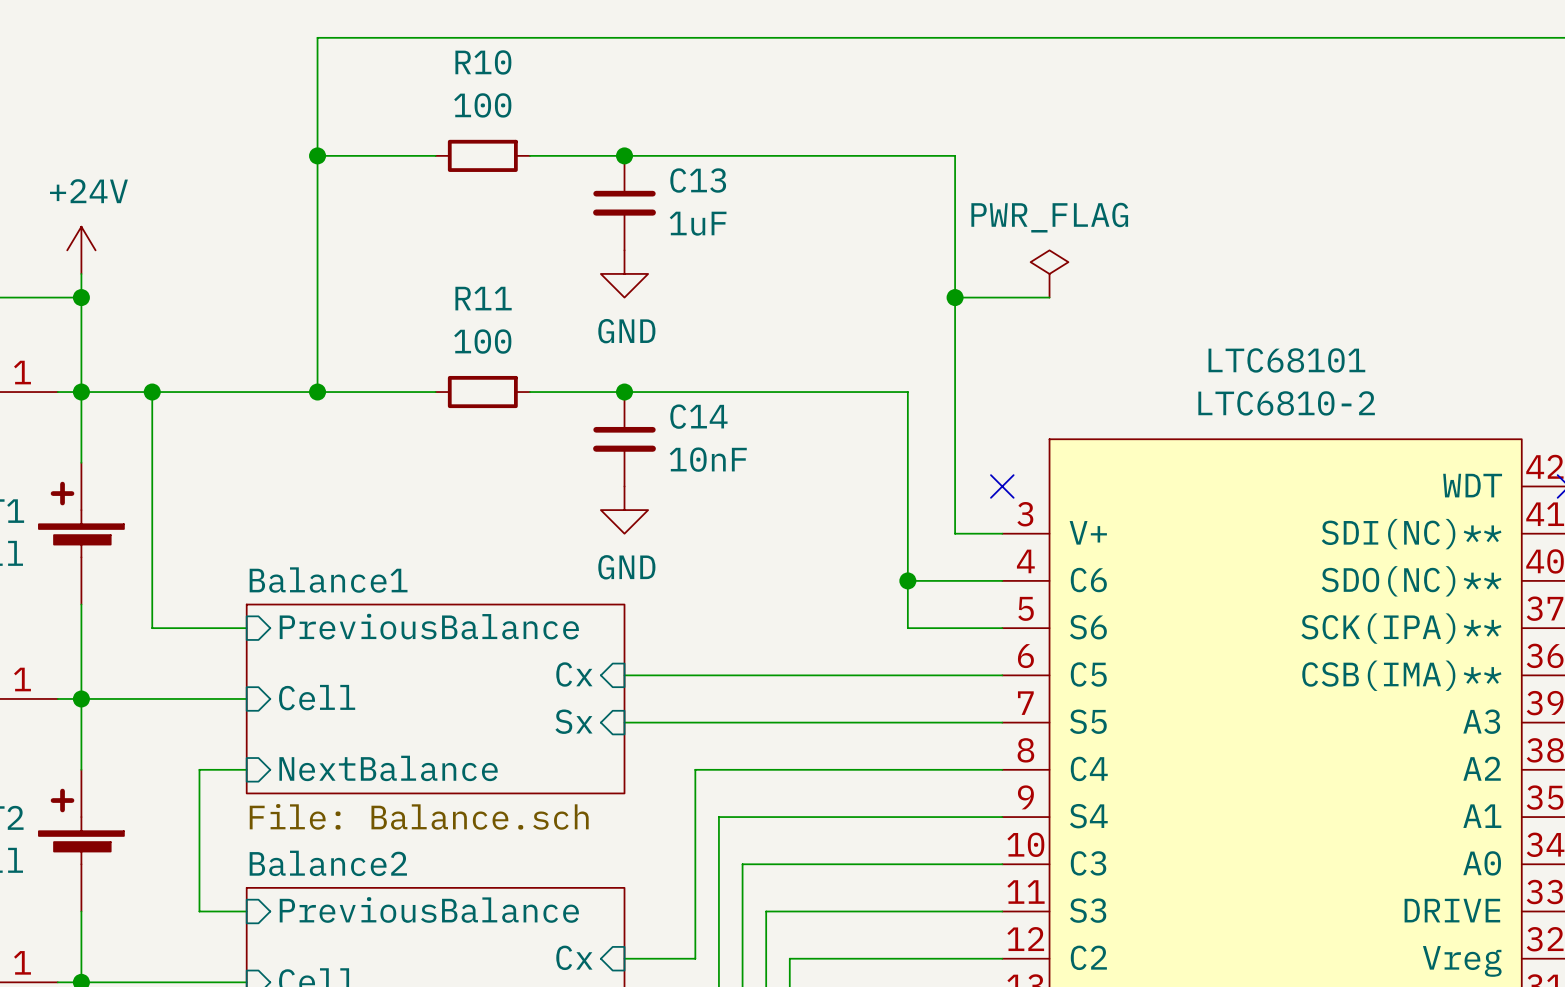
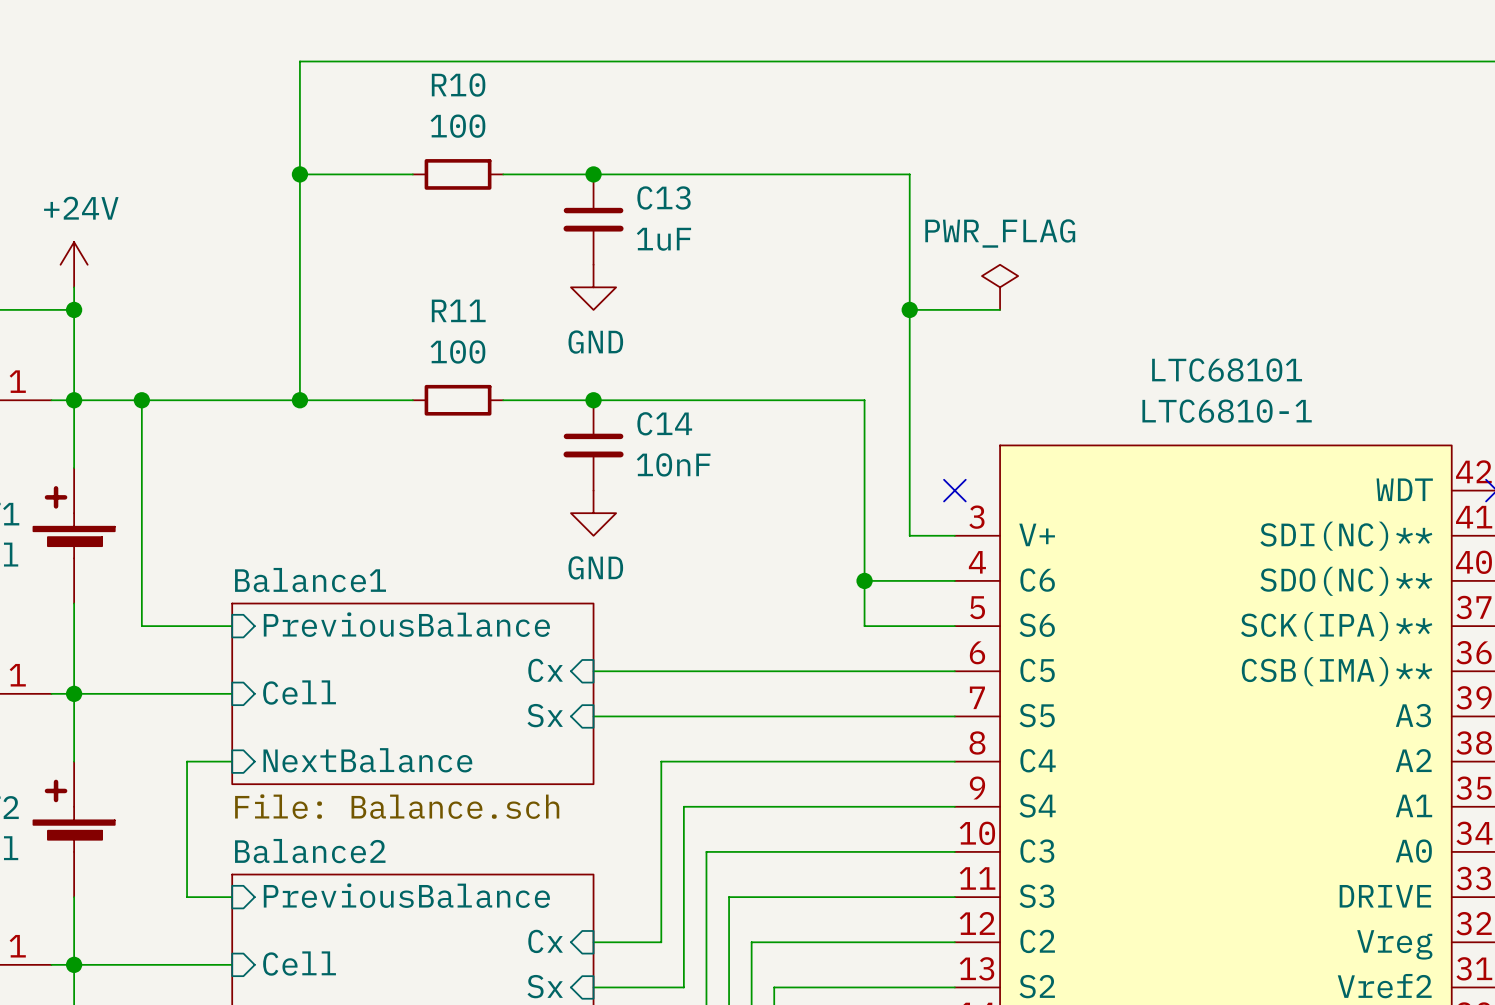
LTC68101 value: LTC6810-2 (1286, 403) -> LTC6810-1 (1227, 411)

